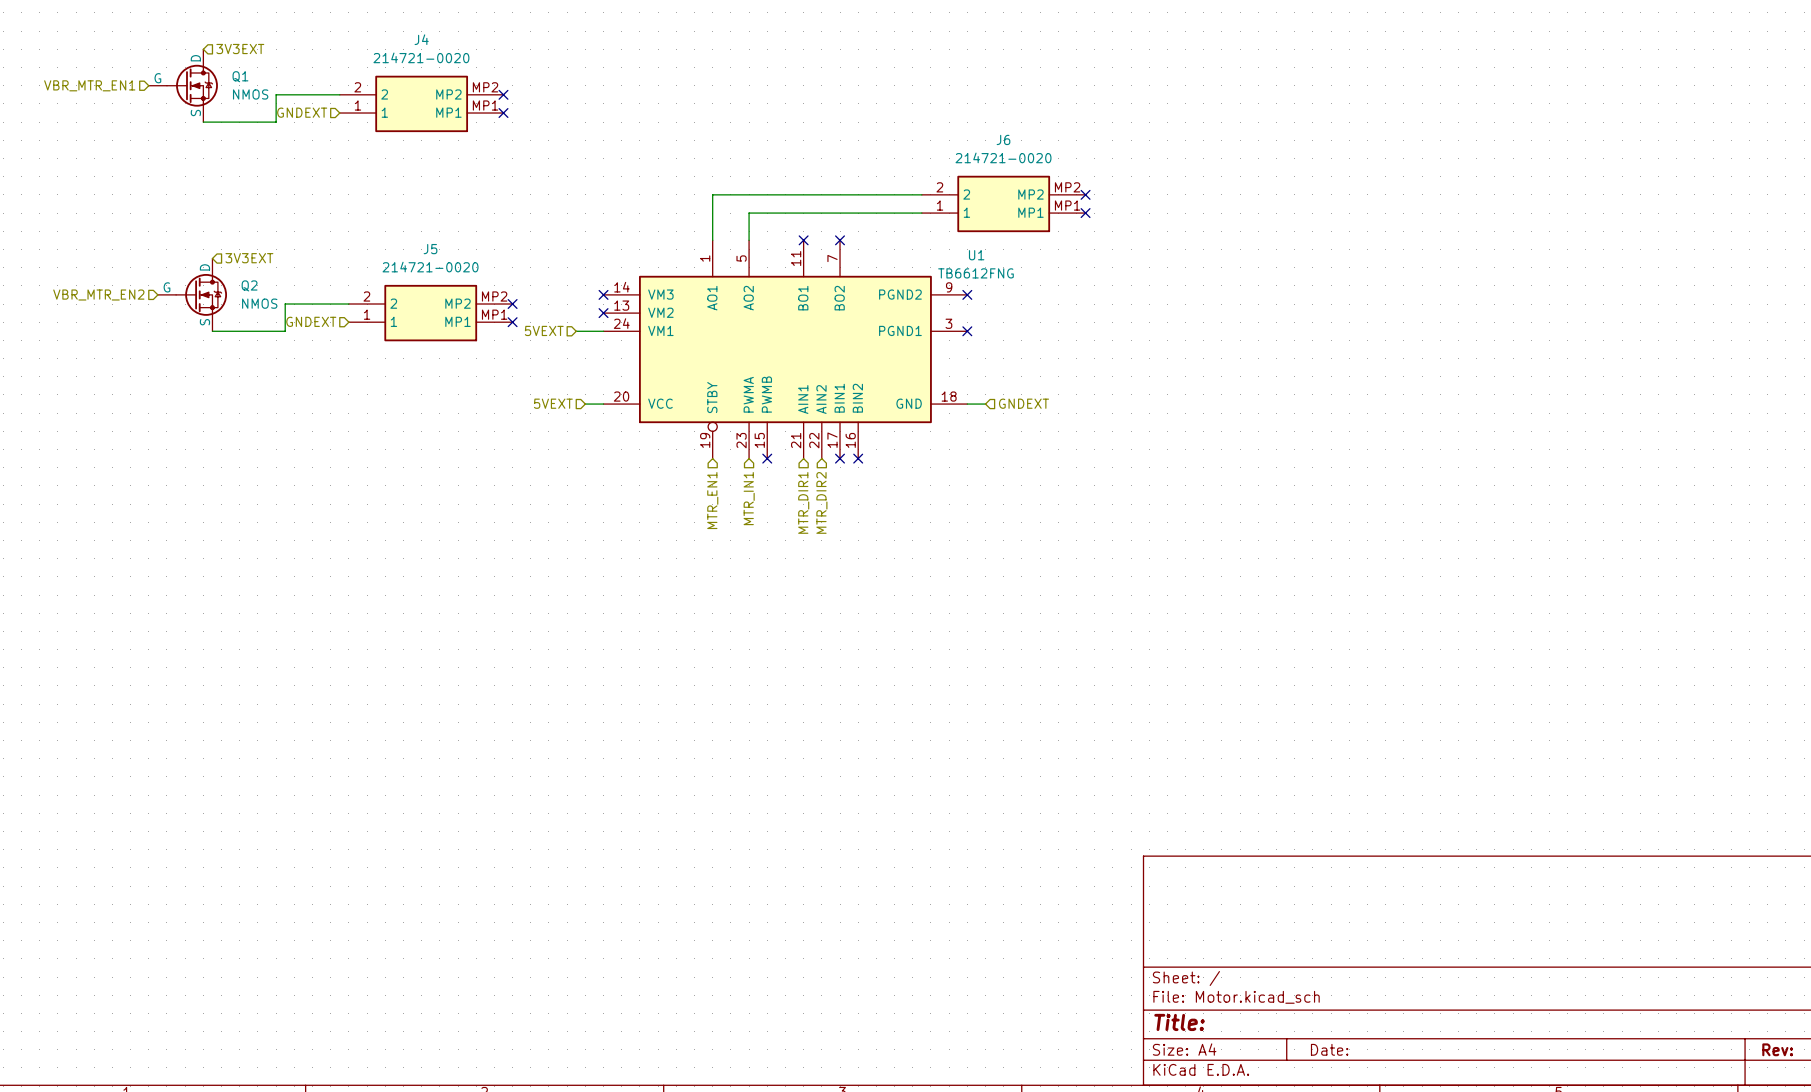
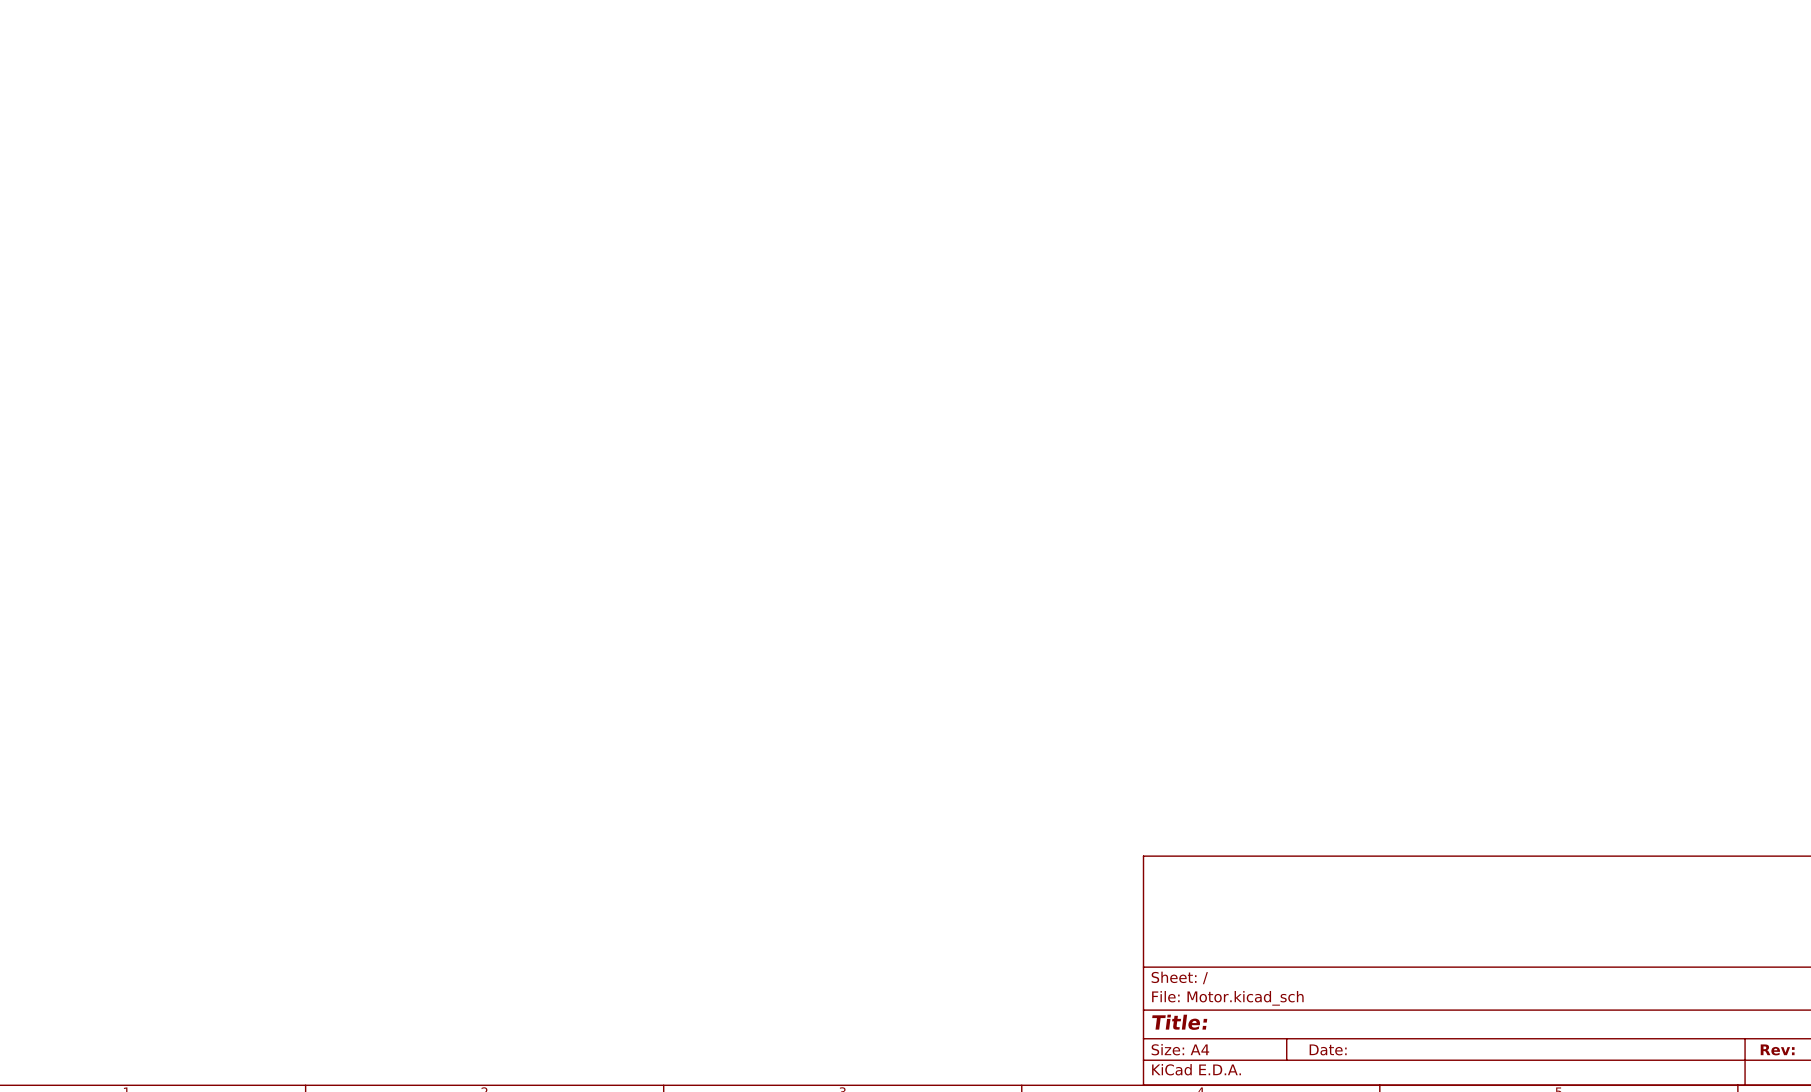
hierarchical label: 3V3EXT (240, 49) -> none
hierarchical label: VBR_MTR_EN1 (89, 85) -> none
Q1: NMOS (183, 85) -> none
wire: (339, 94) (276, 94) (276, 122) (203, 122) -> none
no-connect mark: (503, 94) -> none
J4: 214721-0020 (421, 103) -> none
hierarchical label: GNDEXT (302, 112) -> none
no-connect mark: (503, 113) -> none
wire: (921, 194) (712, 194) (712, 240) -> none
no-connect mark: (1085, 194) -> none
J6: 214721-0020 (1003, 203) -> none
wire: (921, 213) (749, 213) (749, 240) -> none
no-connect mark: (1085, 213) -> none
no-connect mark: (803, 240) -> none
no-connect mark: (840, 240) -> none
hierarchical label: 3V3EXT (249, 258) -> none
Q2: NMOS (192, 294) -> none
no-connect mark: (603, 294) -> none
no-connect mark: (967, 294) -> none
hierarchical label: VBR_MTR_EN2 (98, 295) -> none
wire: (348, 304) (285, 304) (285, 331) (212, 331) -> none
no-connect mark: (512, 304) -> none
J5: 214721-0020 (430, 313) -> none
no-connect mark: (603, 313) -> none
hierarchical label: GNDEXT (311, 321) -> none
no-connect mark: (512, 322) -> none
hierarchical label: 5VEXT (544, 330) -> none
wire: (576, 331) (603, 331) -> none
no-connect mark: (967, 331) -> none
U1: TB6612FNG (785, 349) -> none
hierarchical label: 5VEXT (553, 403) -> none
hierarchical label: GNDEXT (1023, 403) -> none
wire: (585, 404) (603, 404) -> none
wire: (967, 404) (985, 404) -> none
no-connect mark: (767, 458) -> none
no-connect mark: (840, 458) -> none
no-connect mark: (858, 458) -> none
hierarchical label: MTR_IN1 (749, 498) -> none
hierarchical label: MTR_EN1 (712, 500) -> none
hierarchical label: MTR_DIR1 (803, 502) -> none
hierarchical label: MTR_DIR2 (821, 502) -> none

